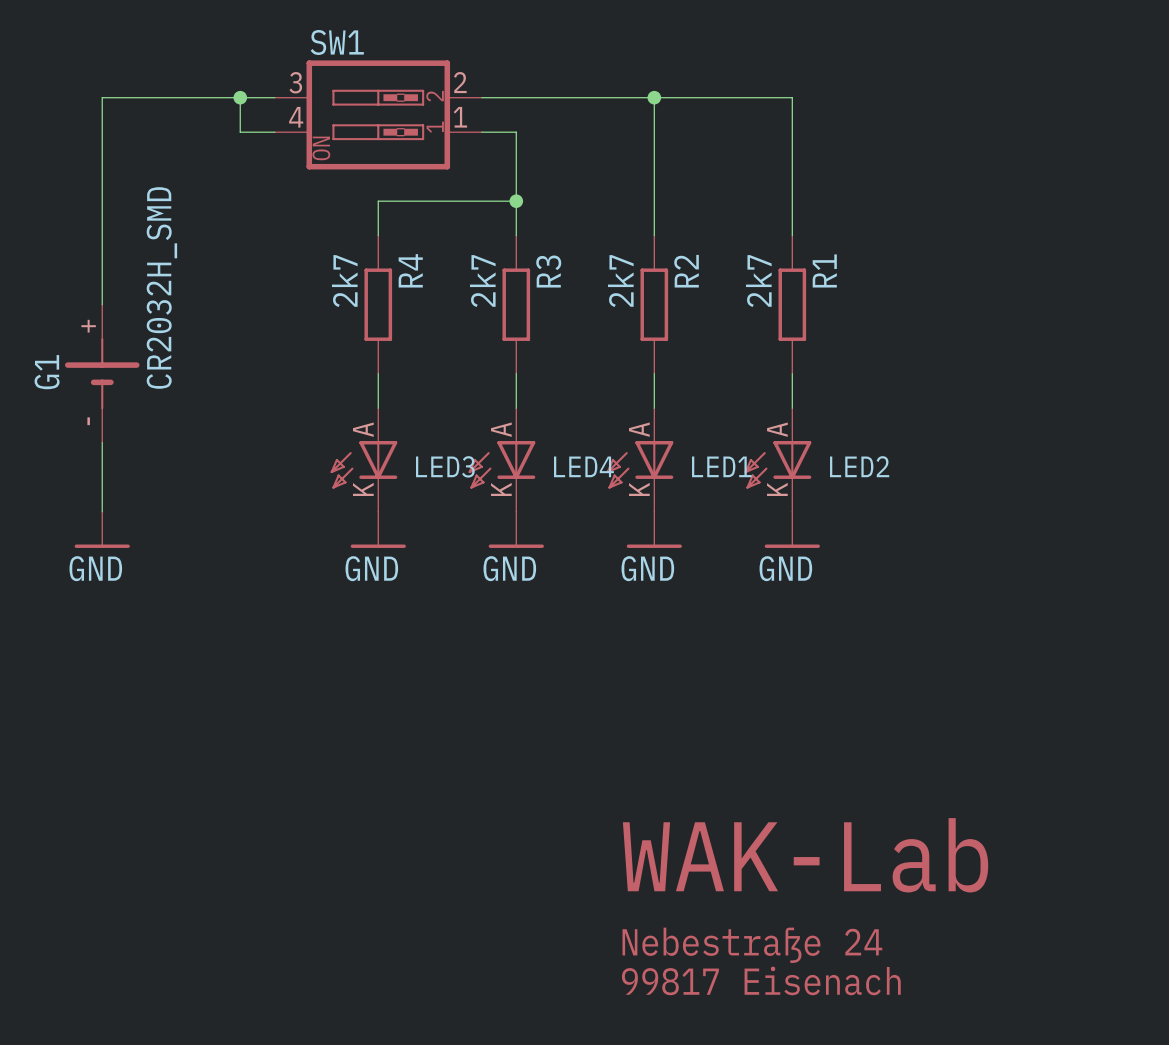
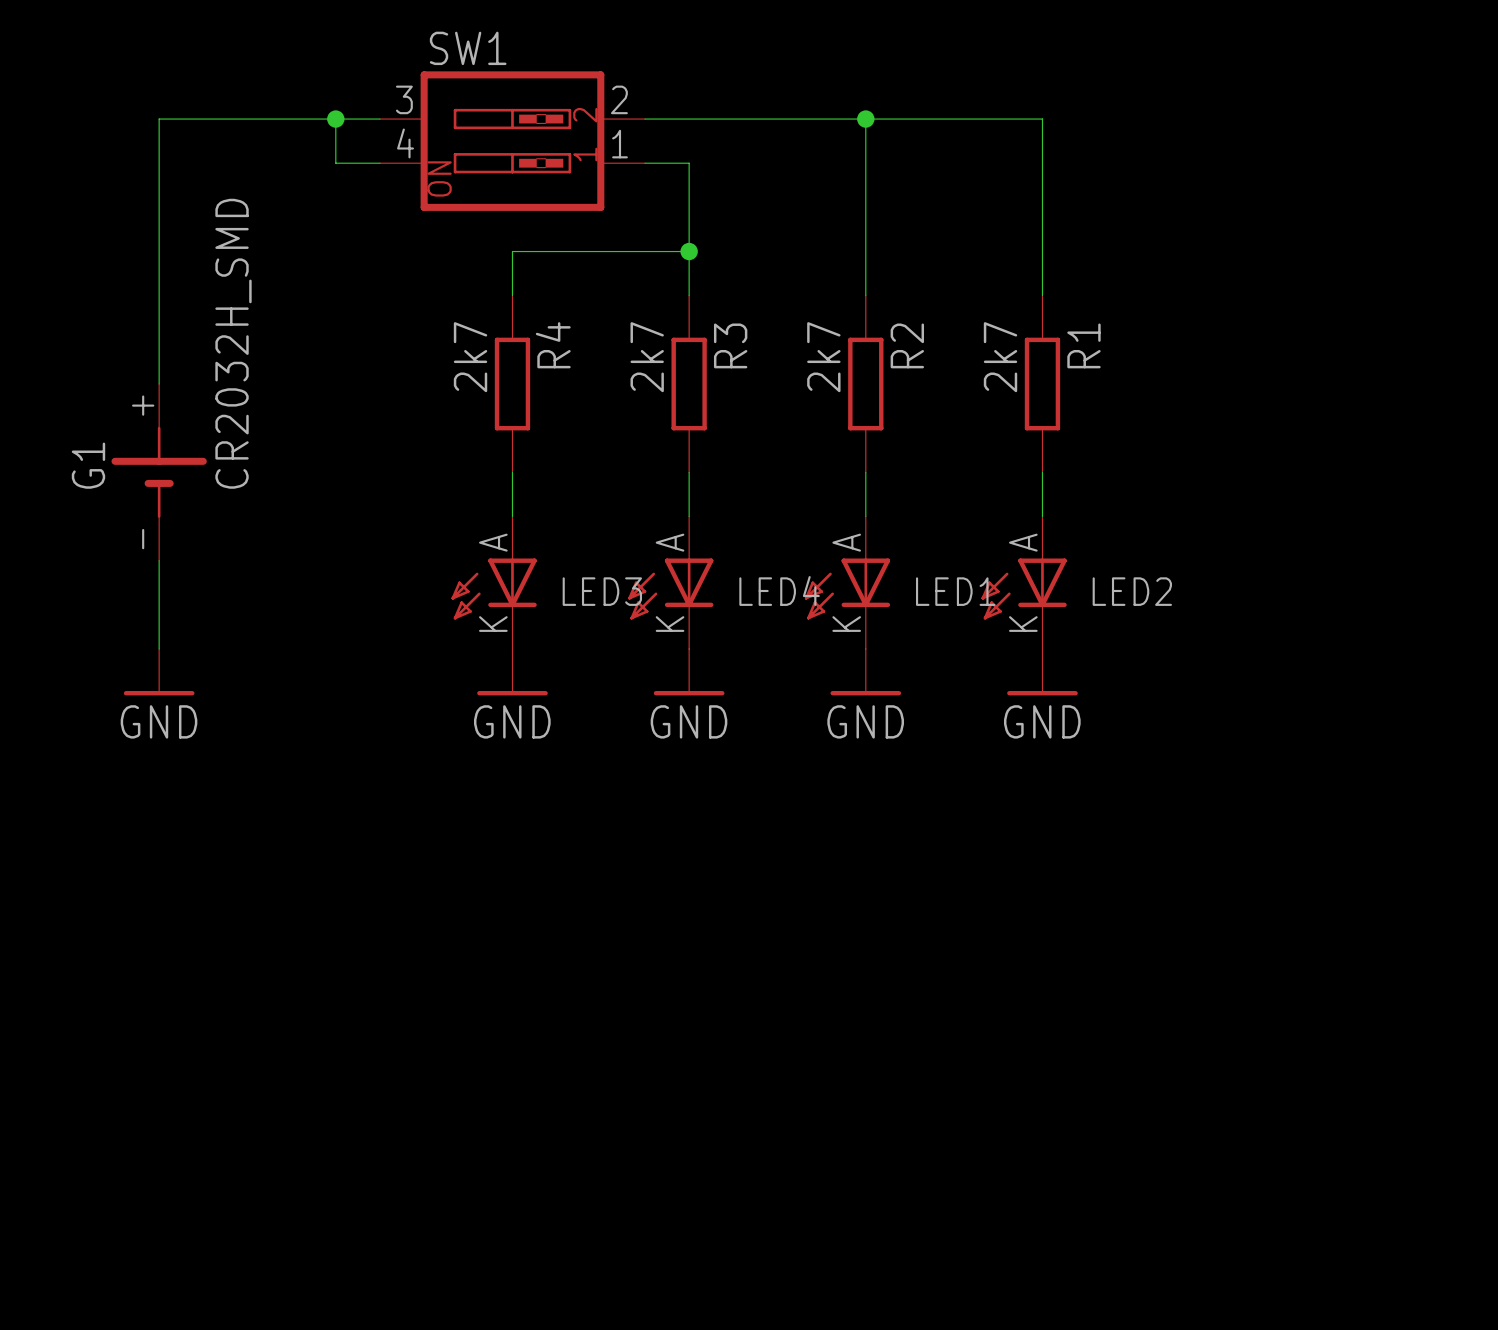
text: WAK-Lab (805, 855) -> none
text: Nebestraße 24 (752, 945) -> none
text: 99817 Eisenach (761, 980) -> none

